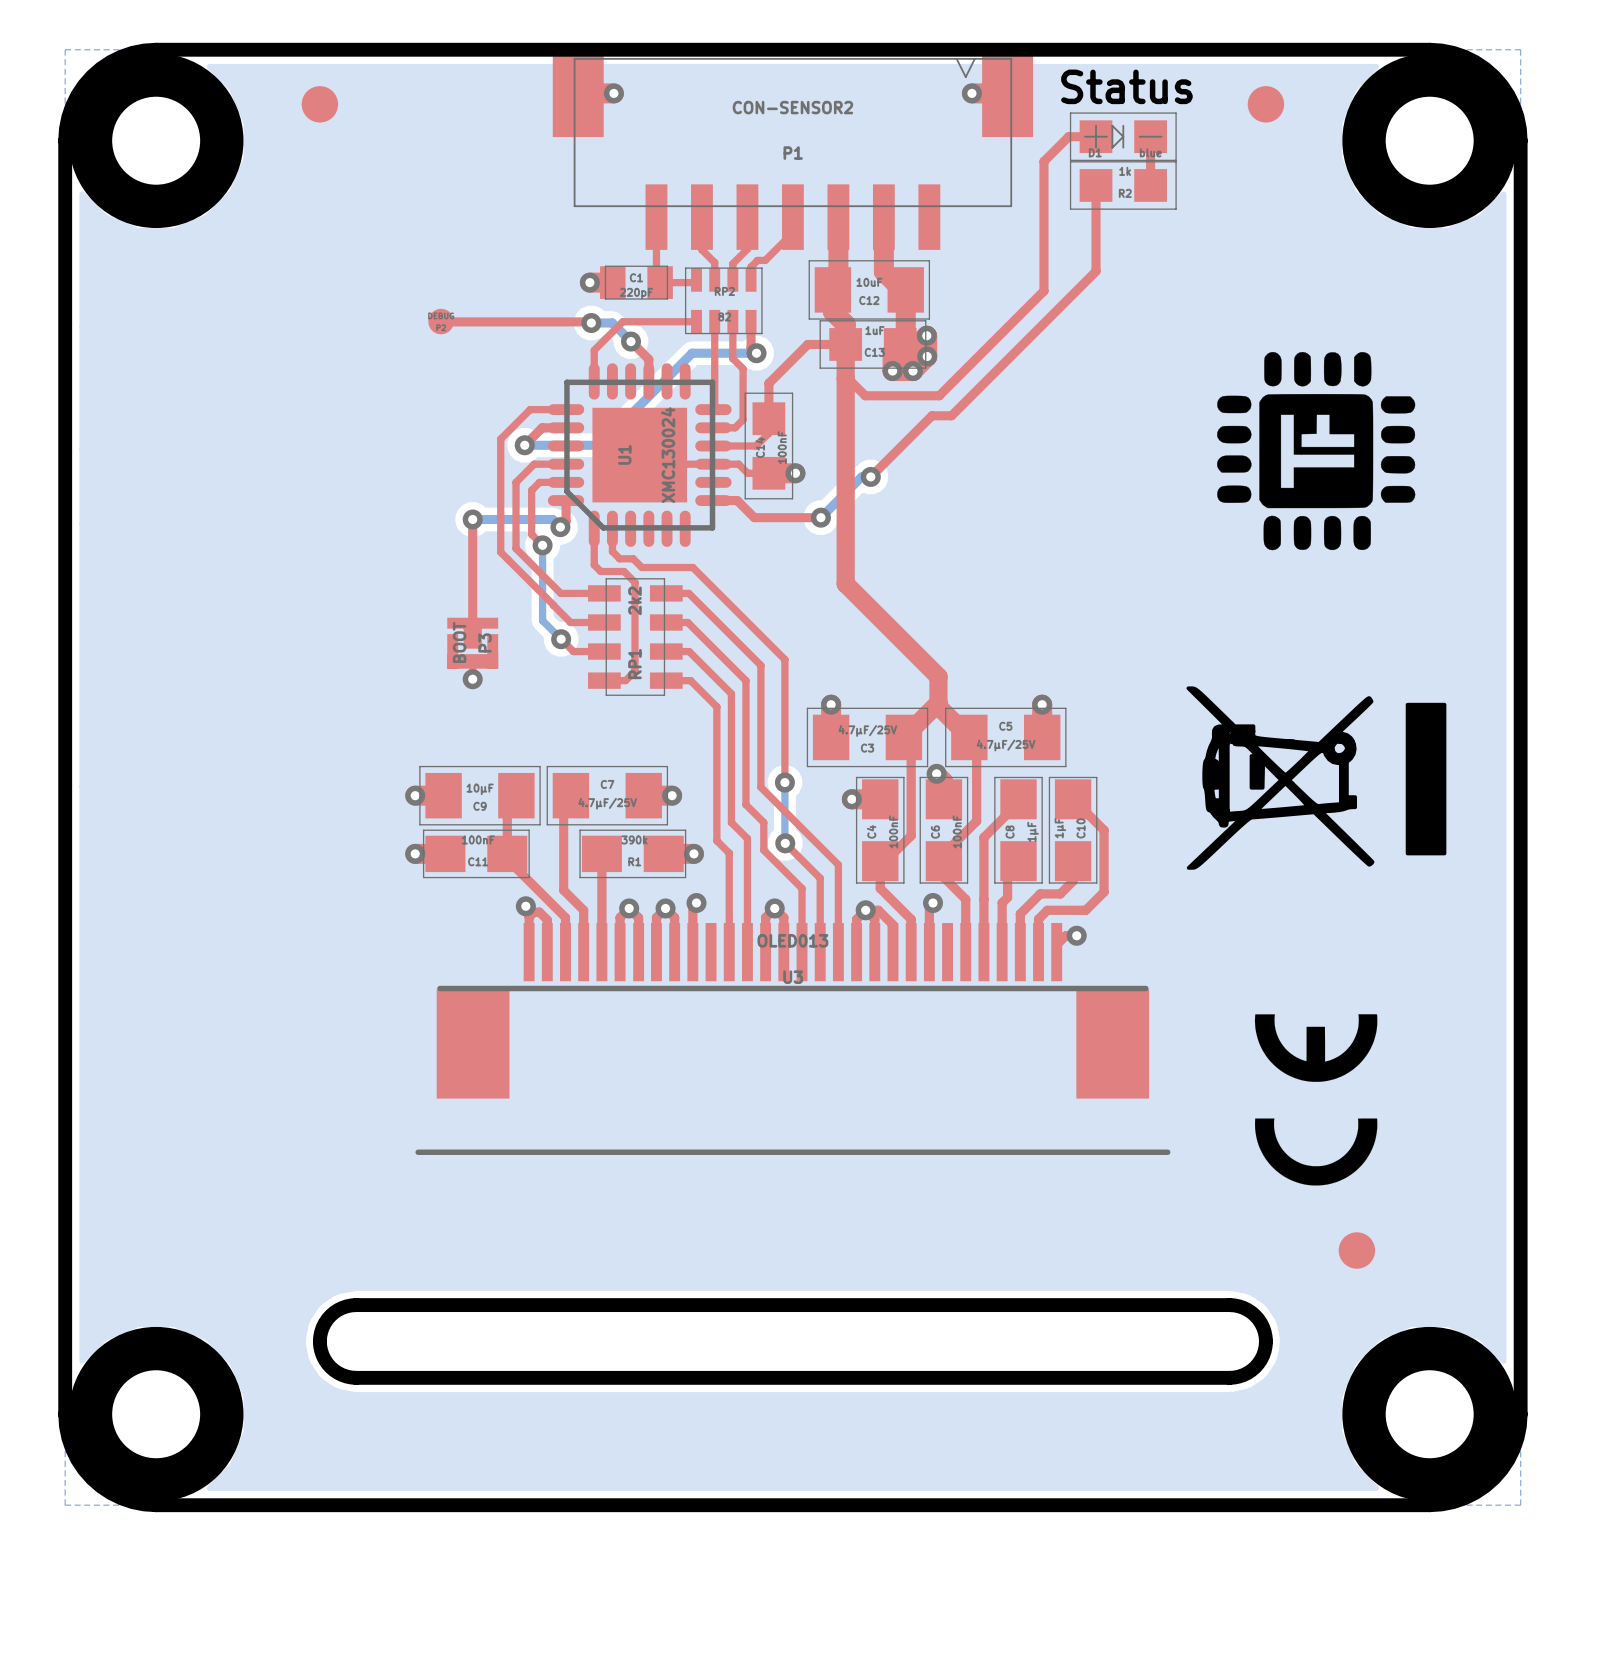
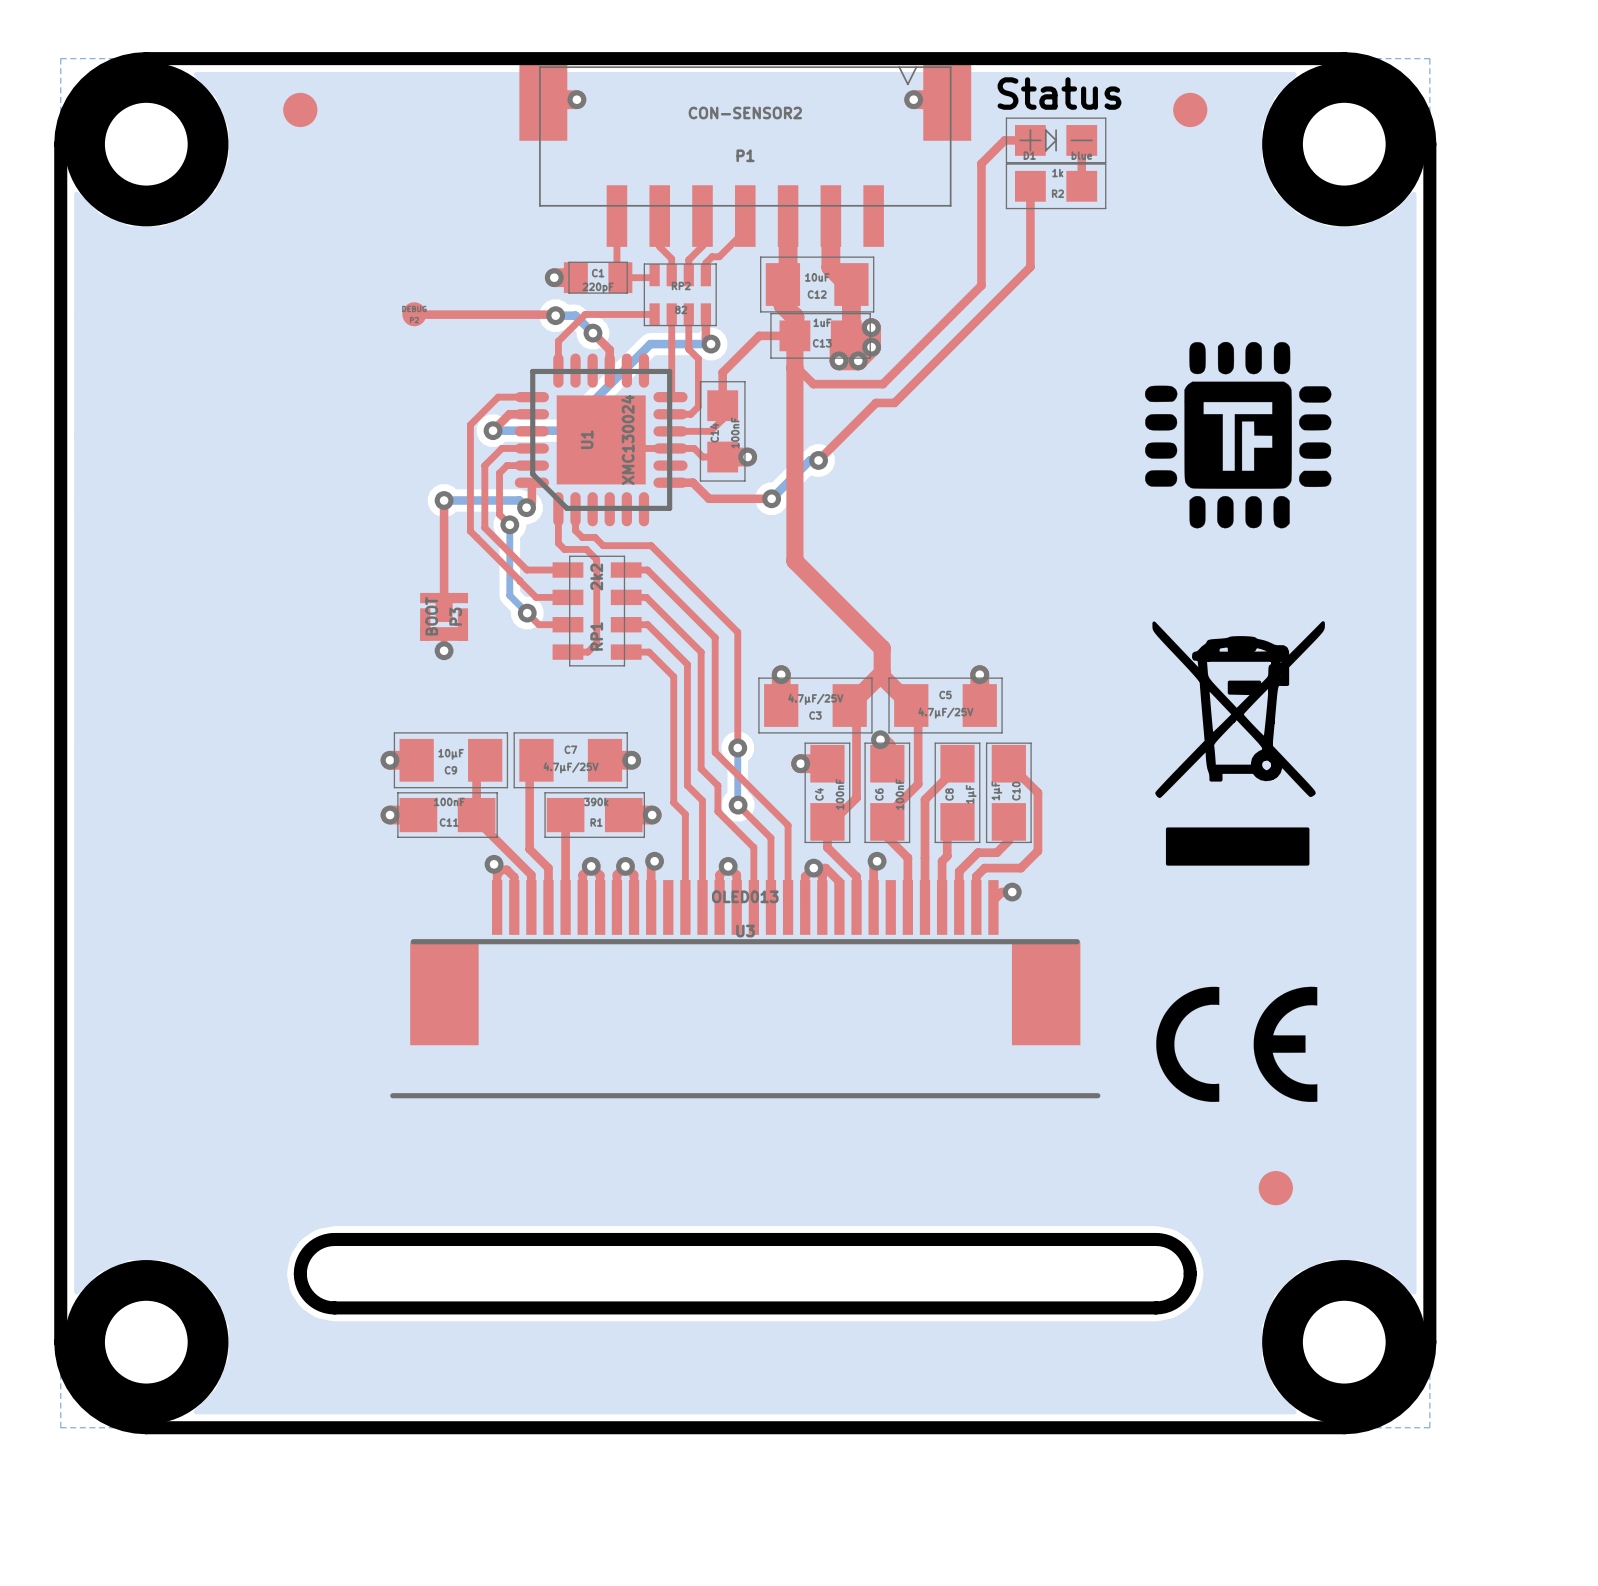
drawing shape: [1217, 351, 1416, 551] -> [1144, 341, 1332, 529]
drawing shape: [1186, 686, 1447, 870] -> [1152, 621, 1325, 866]
drawing shape: [1254, 1014, 1378, 1186] -> [1156, 986, 1318, 1102]

